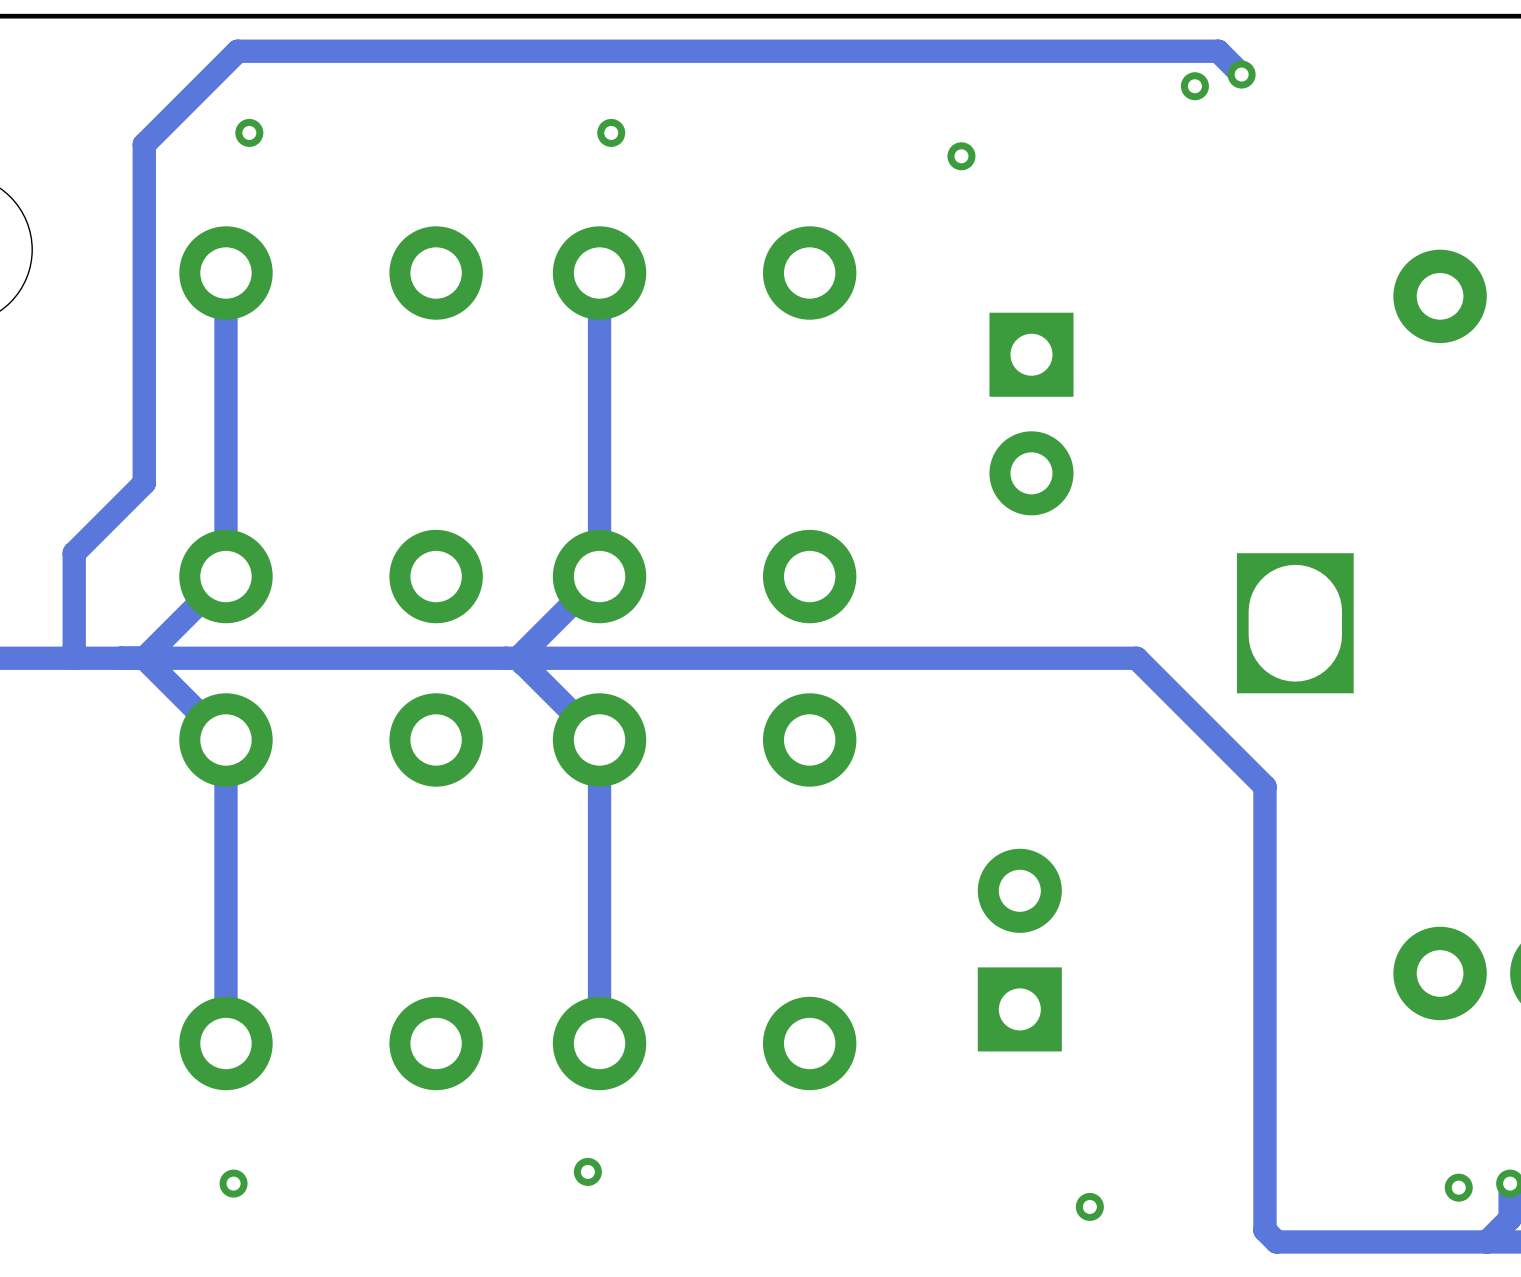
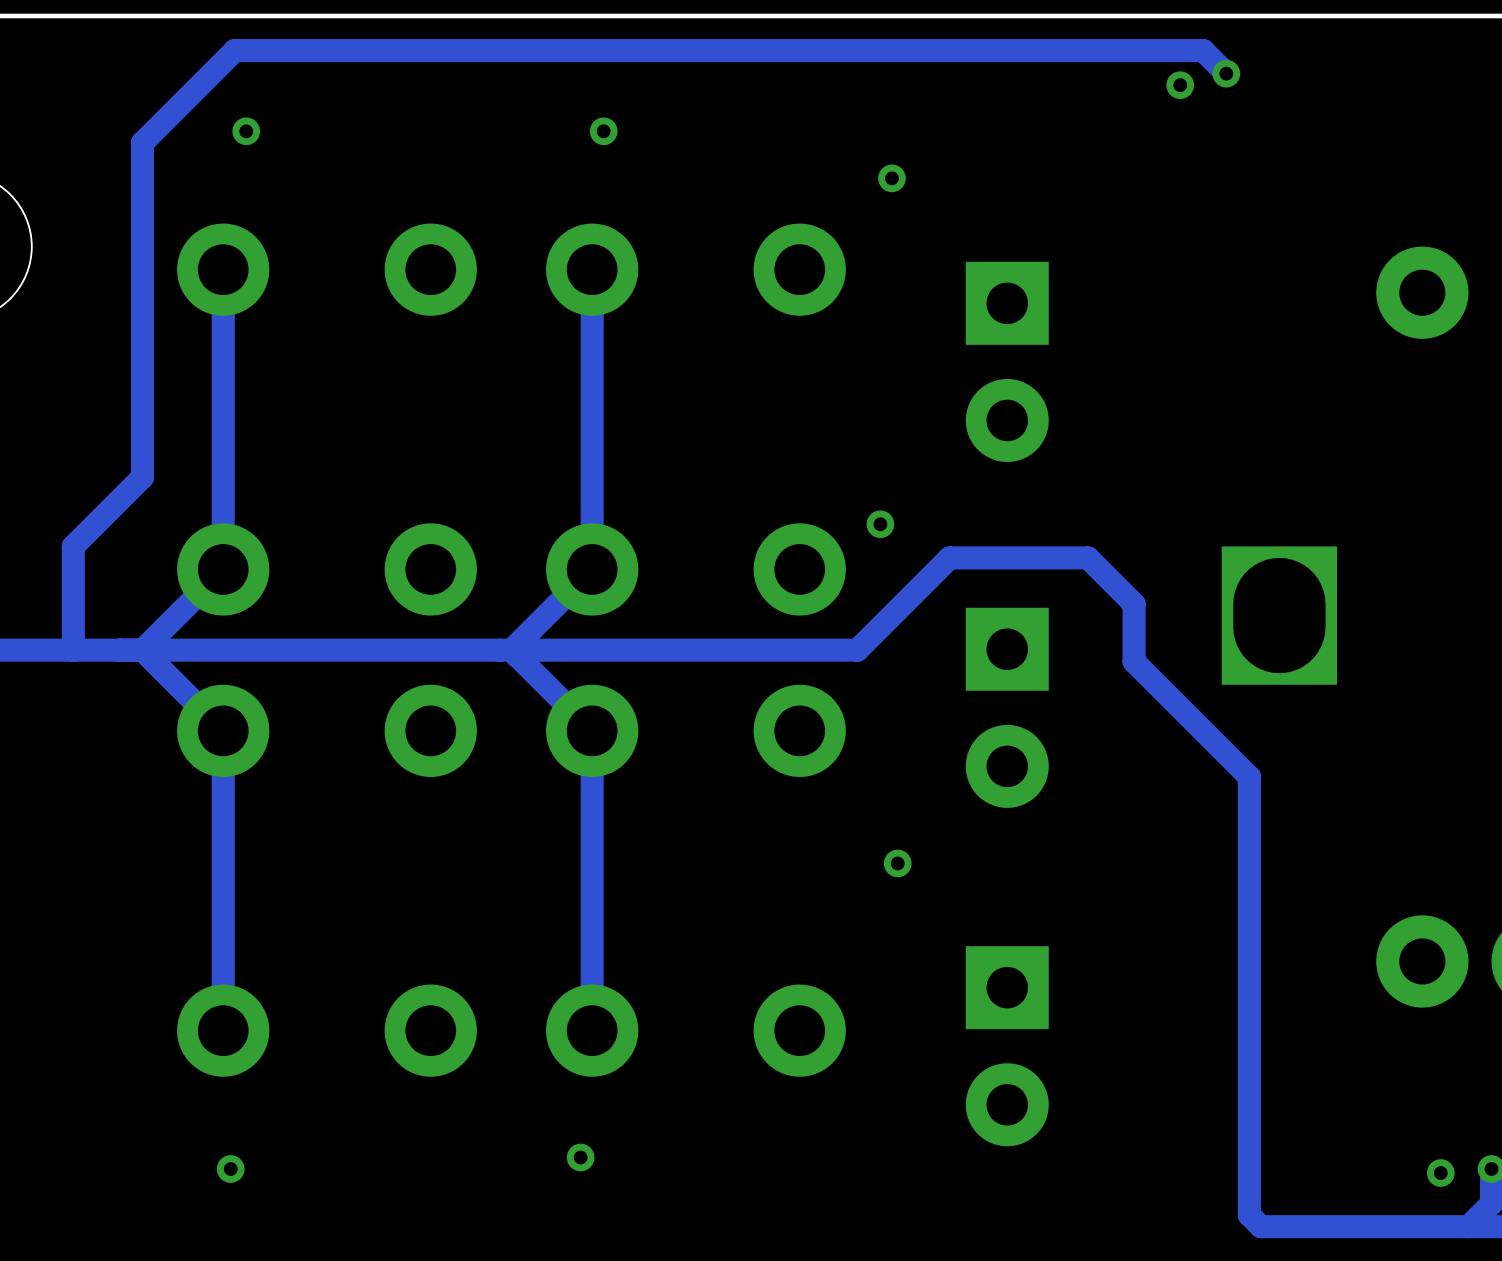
via position: (961, 156) -> (891, 178)
part position: (1031, 414) -> (1007, 361)
via: none -> (880, 524)
track: (868, 658) (1136, 658) (1148, 669) -> (857, 650) (949, 557) (1087, 557) (1134, 604) (1134, 661)
part: none -> (1007, 707)
via: none -> (897, 863)
part rotation: 0° (1019, 950) -> 180° (1007, 1046)
via: (1089, 1206) -> none

